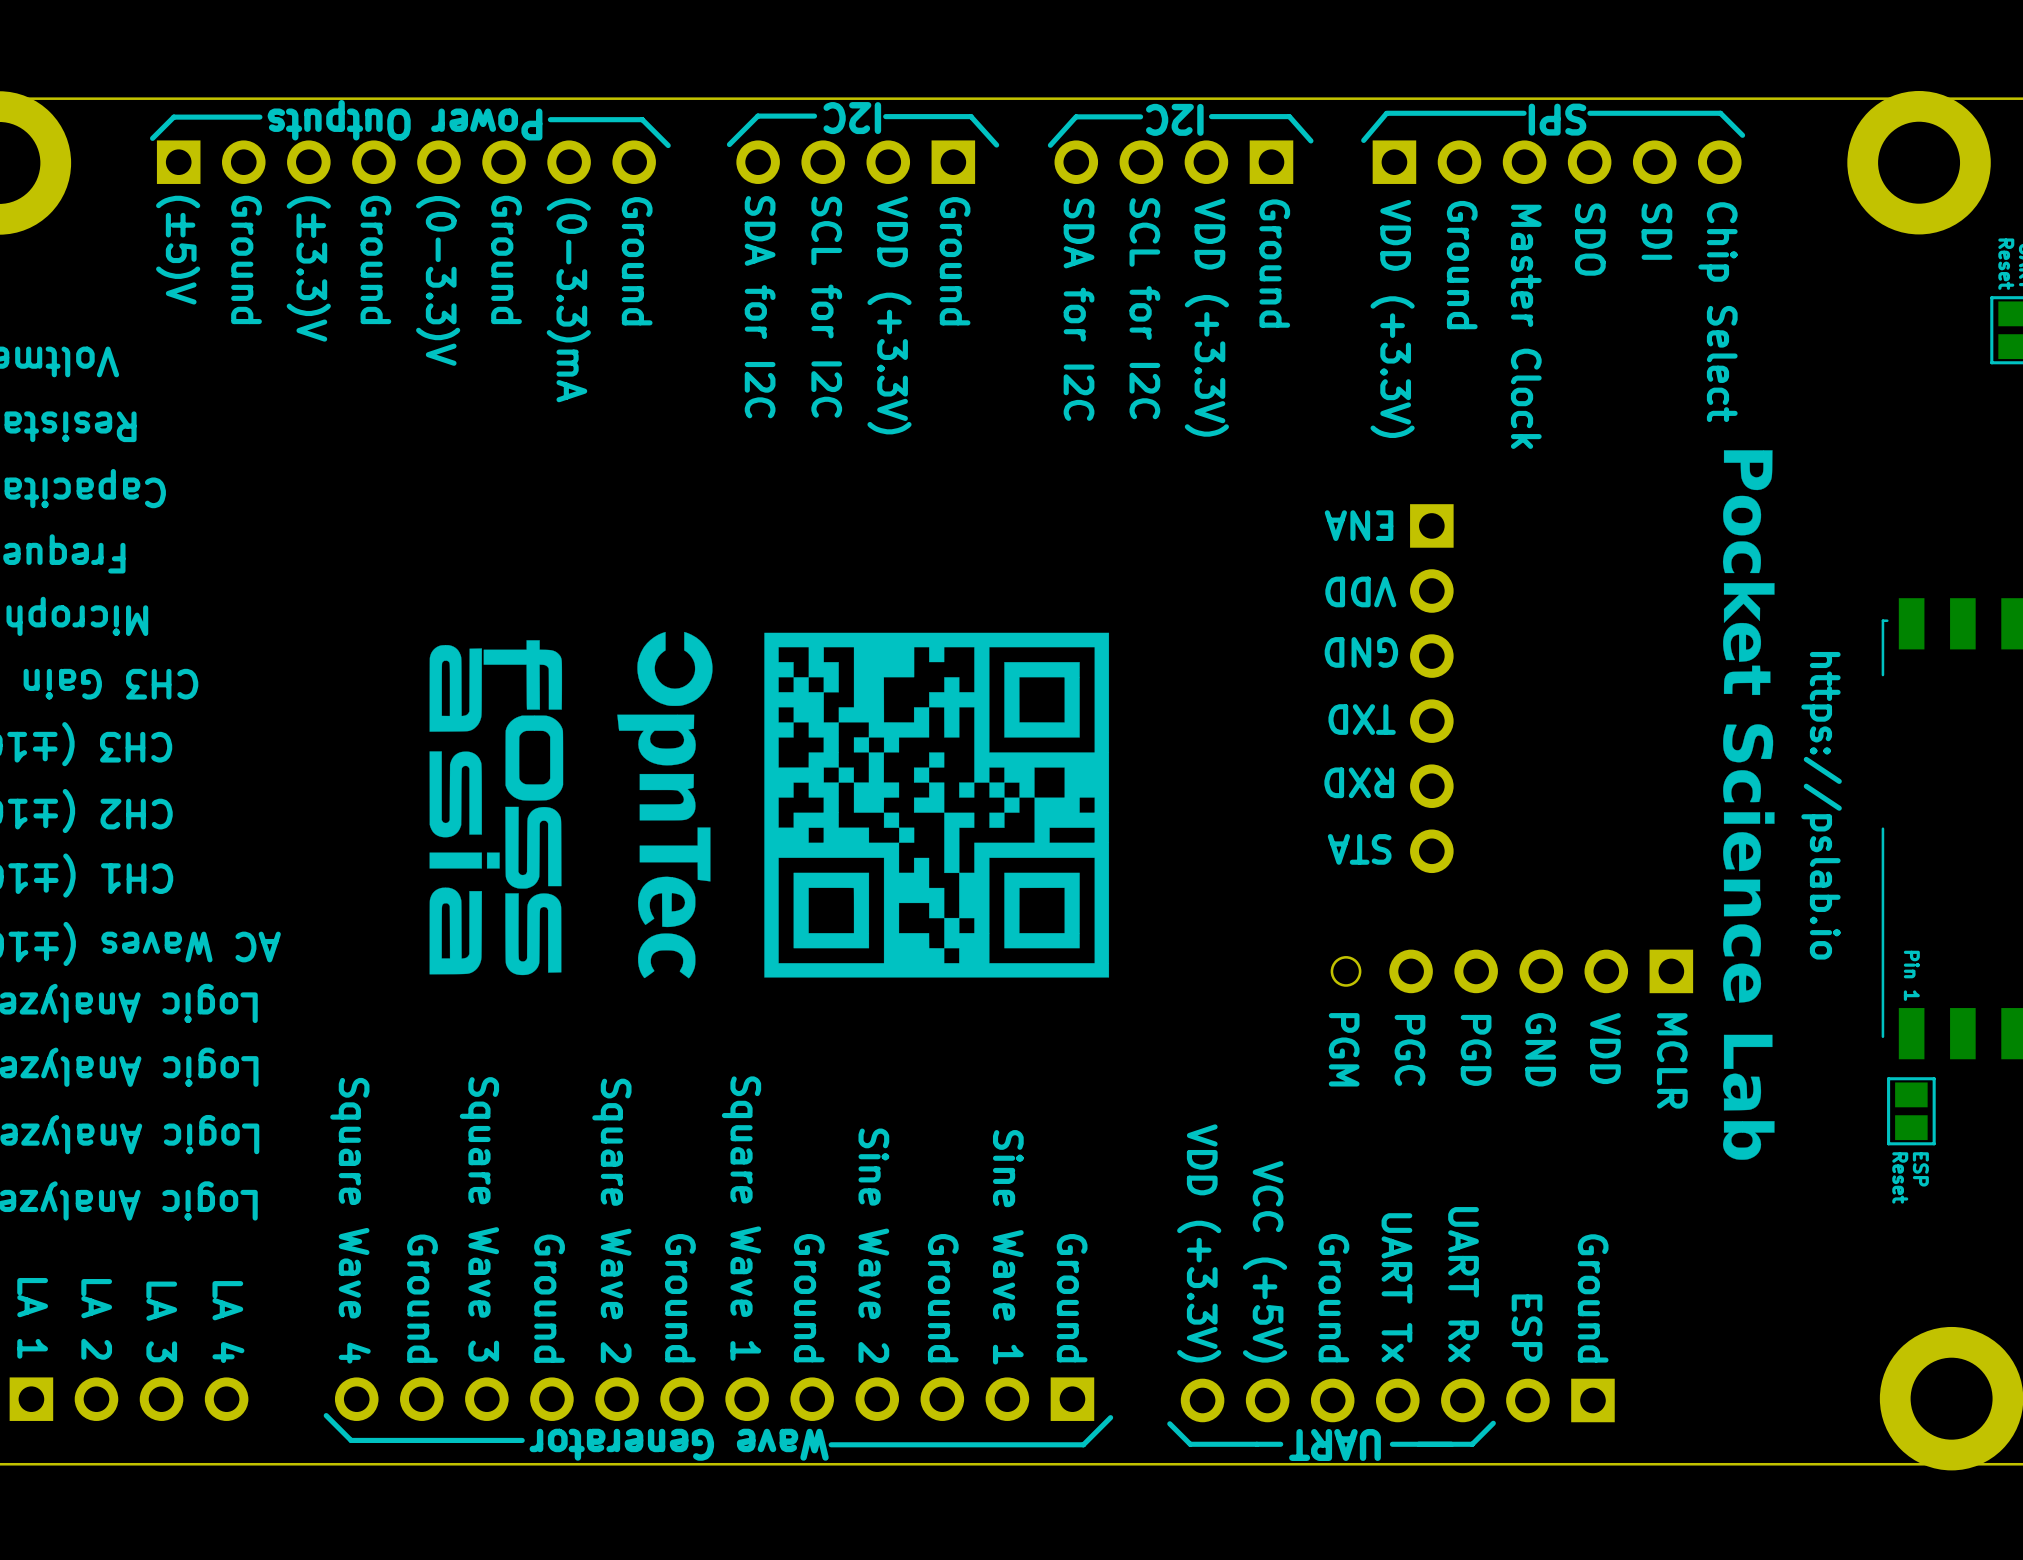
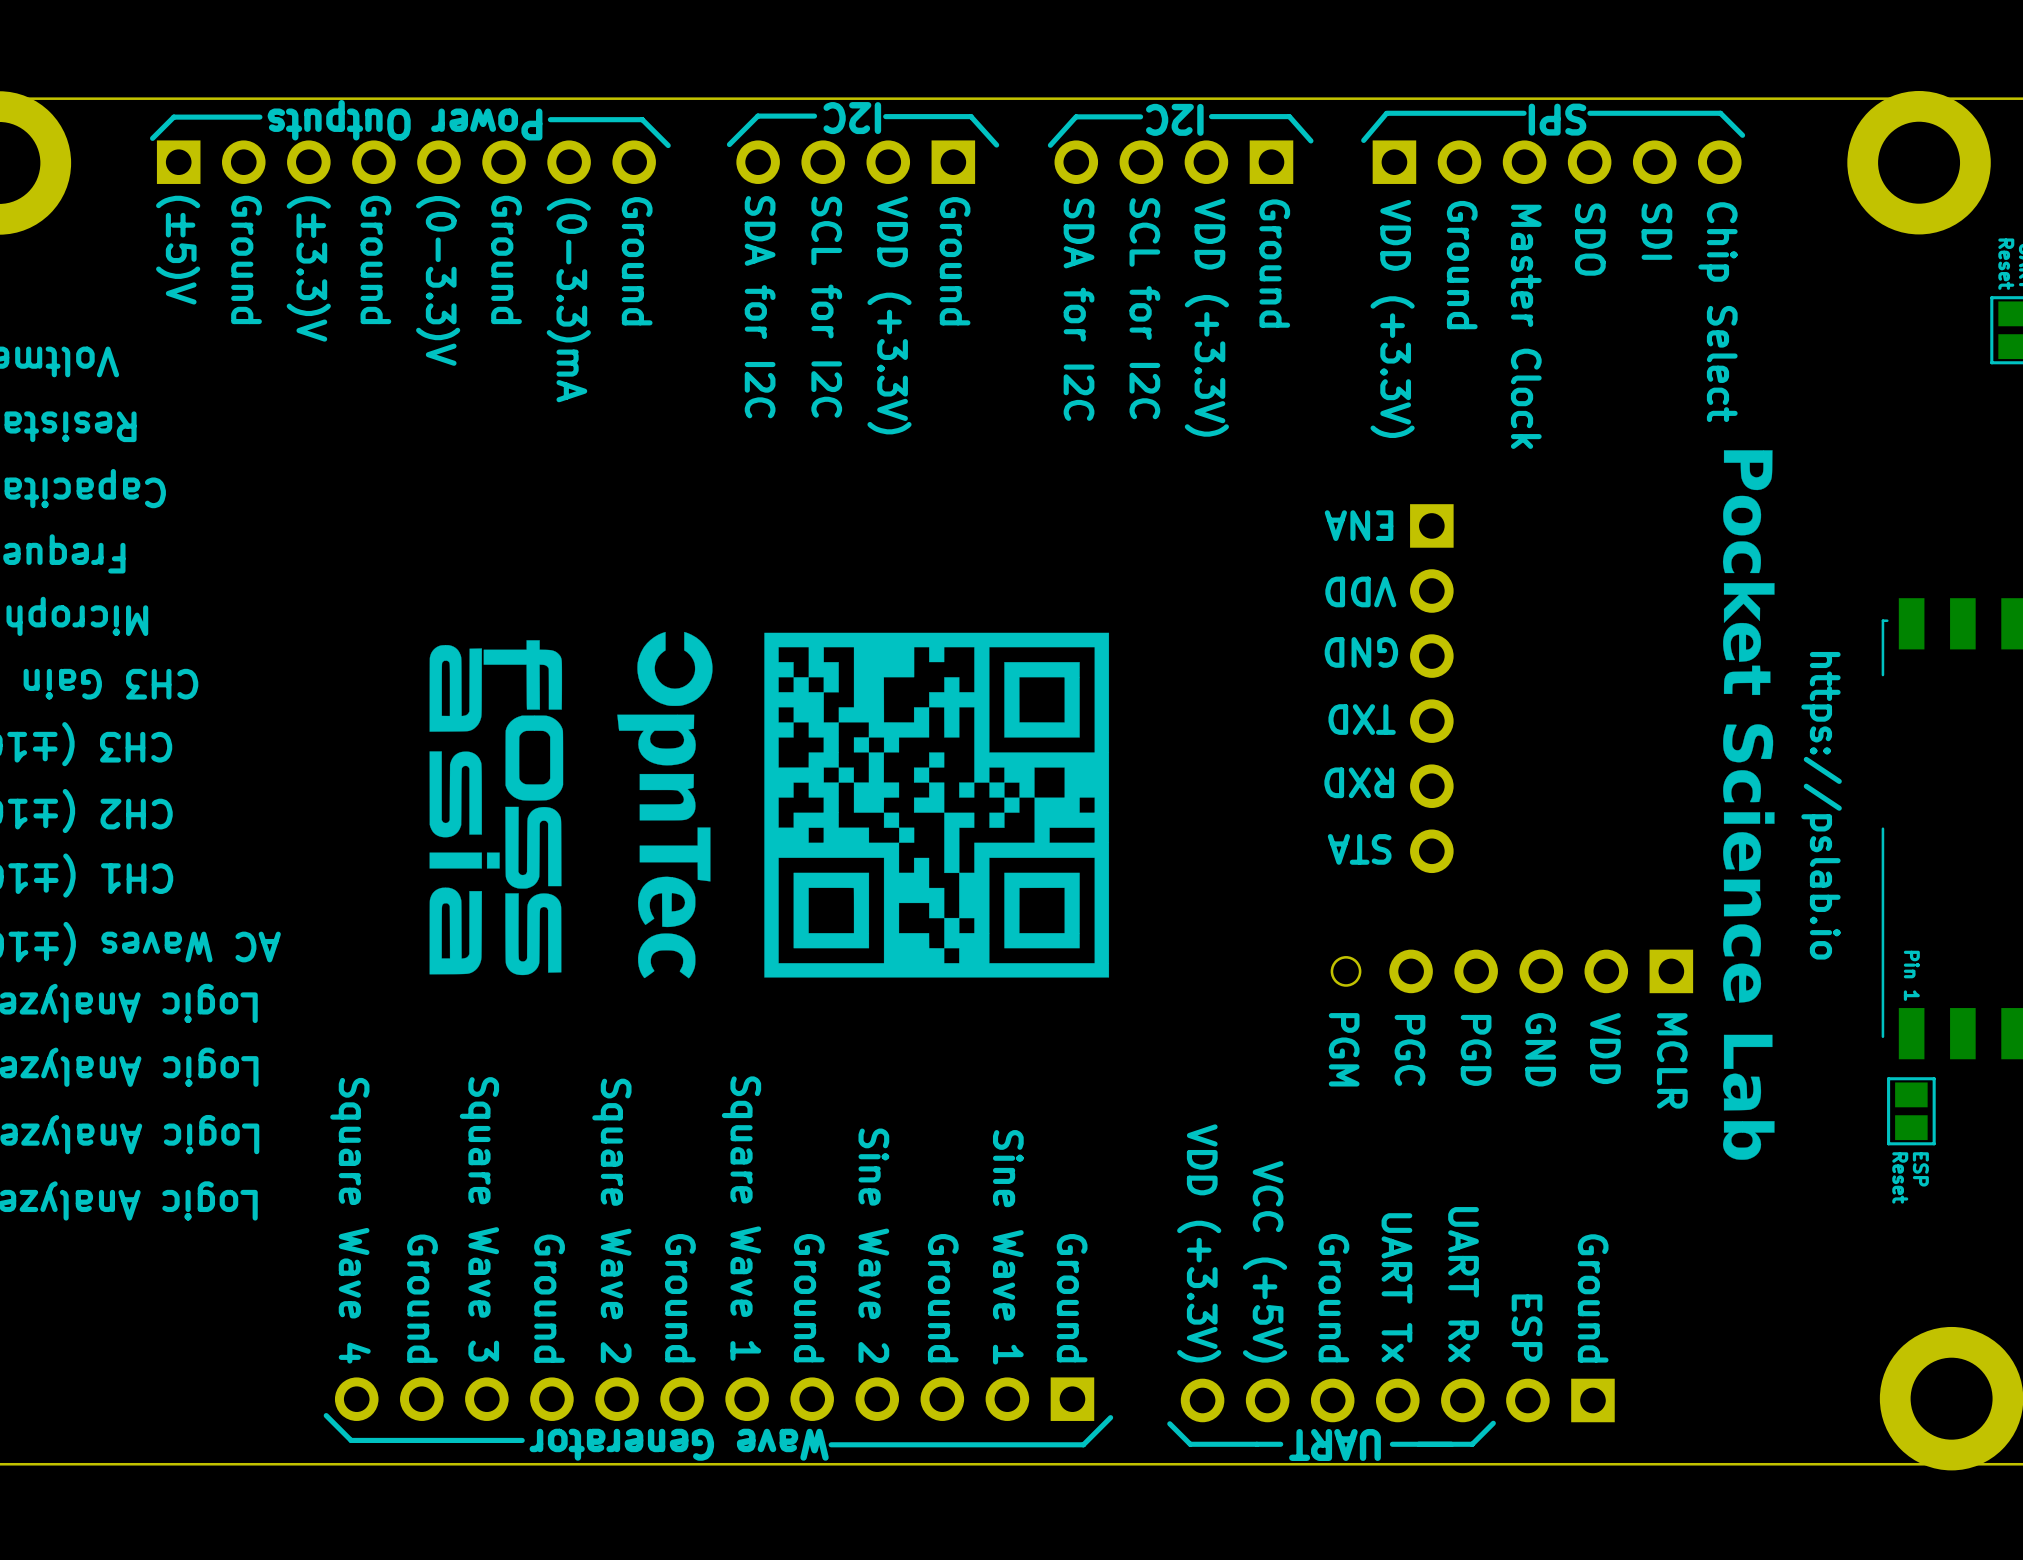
text: LA 1 (32, 1318) -> none
text: LA 2 (96, 1319) -> none
text: LA 3 (161, 1321) -> none
text: LA 4 (228, 1322) -> none
part: (129, 1399) -> none

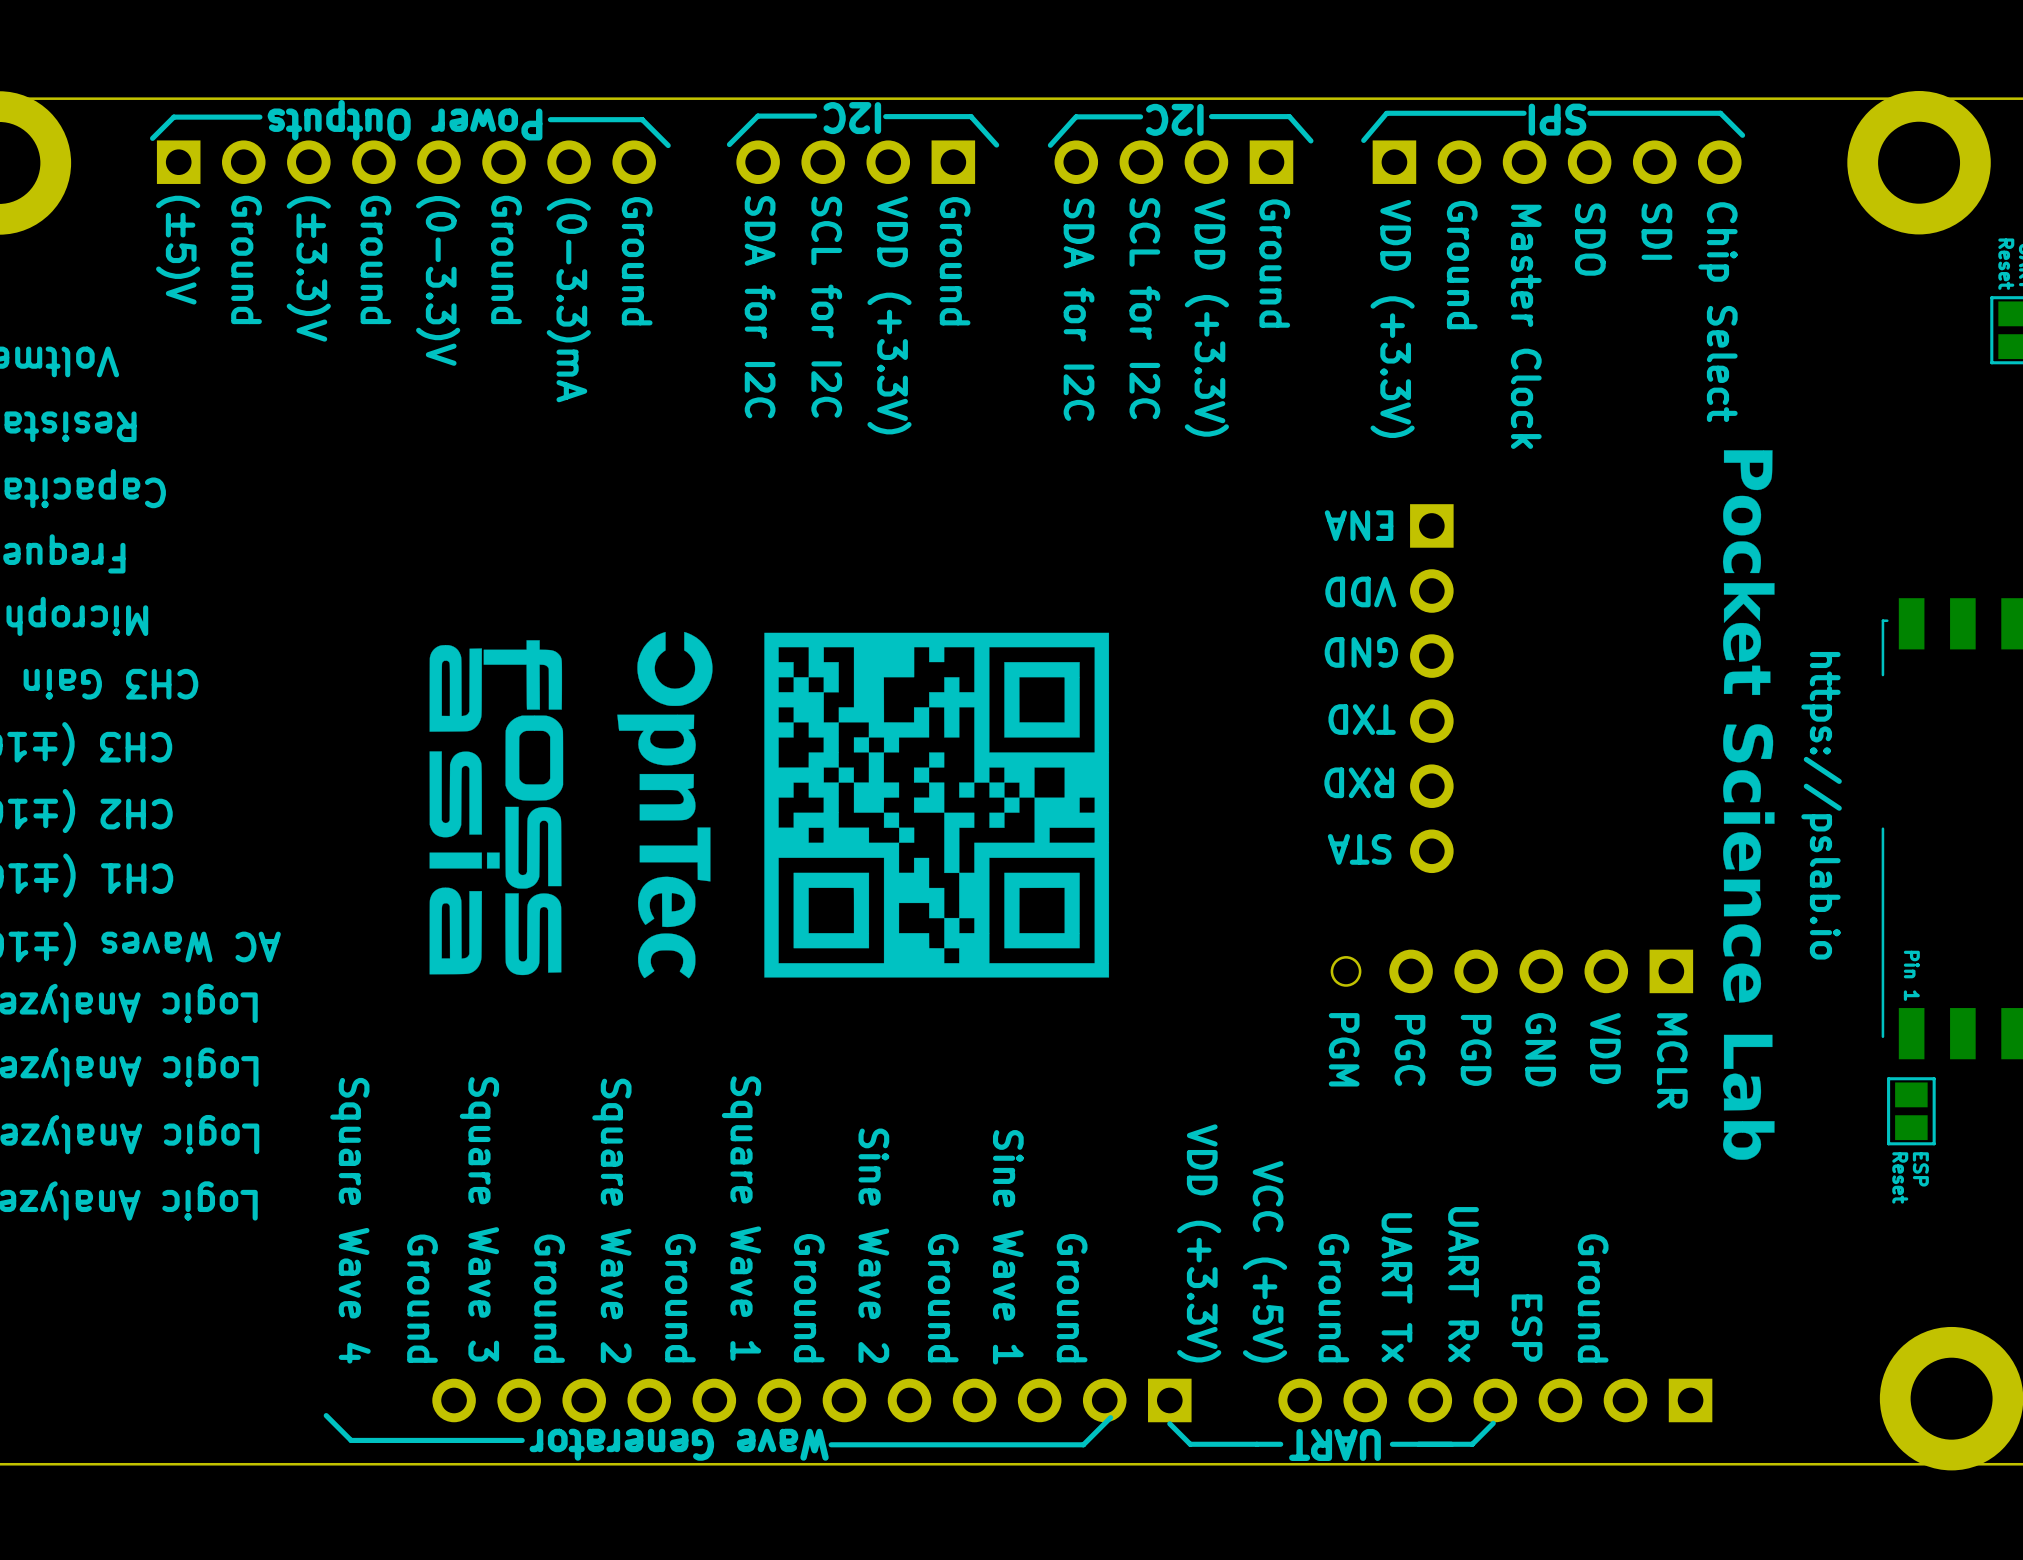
part position: (714, 1399) -> (811, 1400)
part position: (1397, 1400) -> (1495, 1400)

